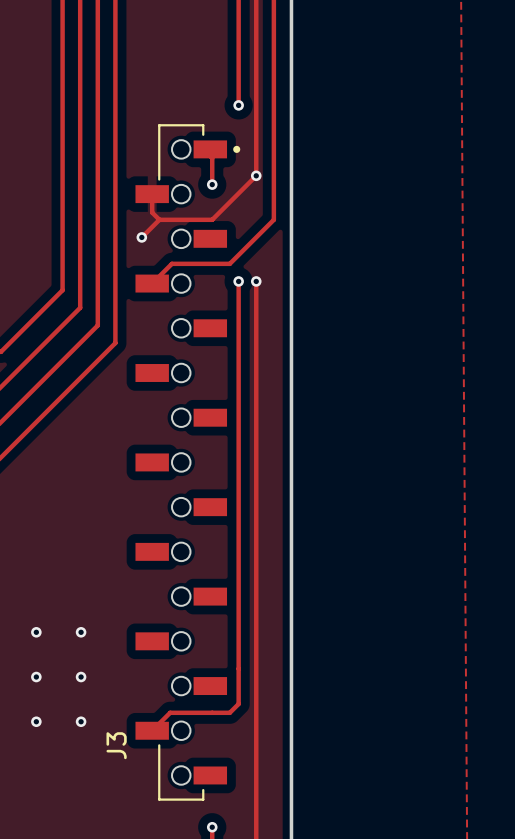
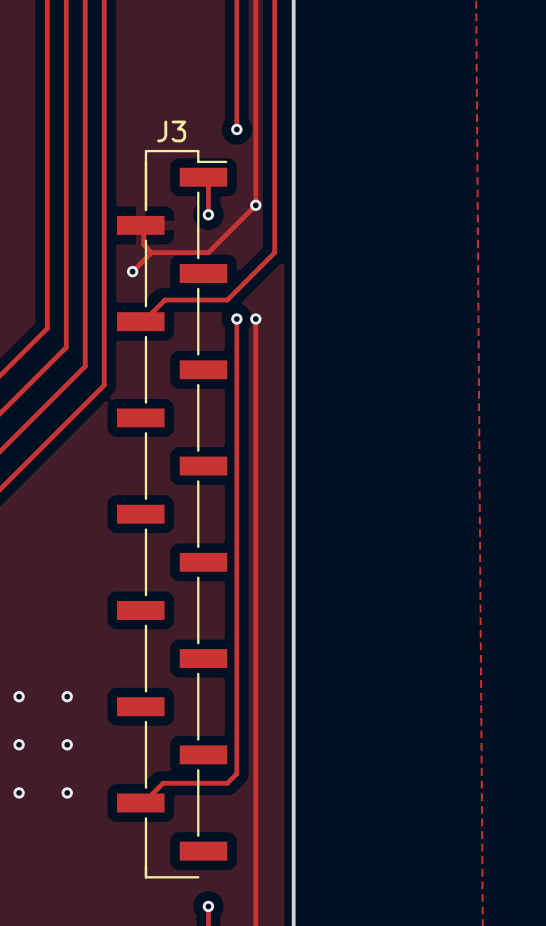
J3 footprint: [135, 124, 241, 801] -> [116, 149, 228, 879]
J3 name position: J3 (116, 745) -> J3 (171, 131)

